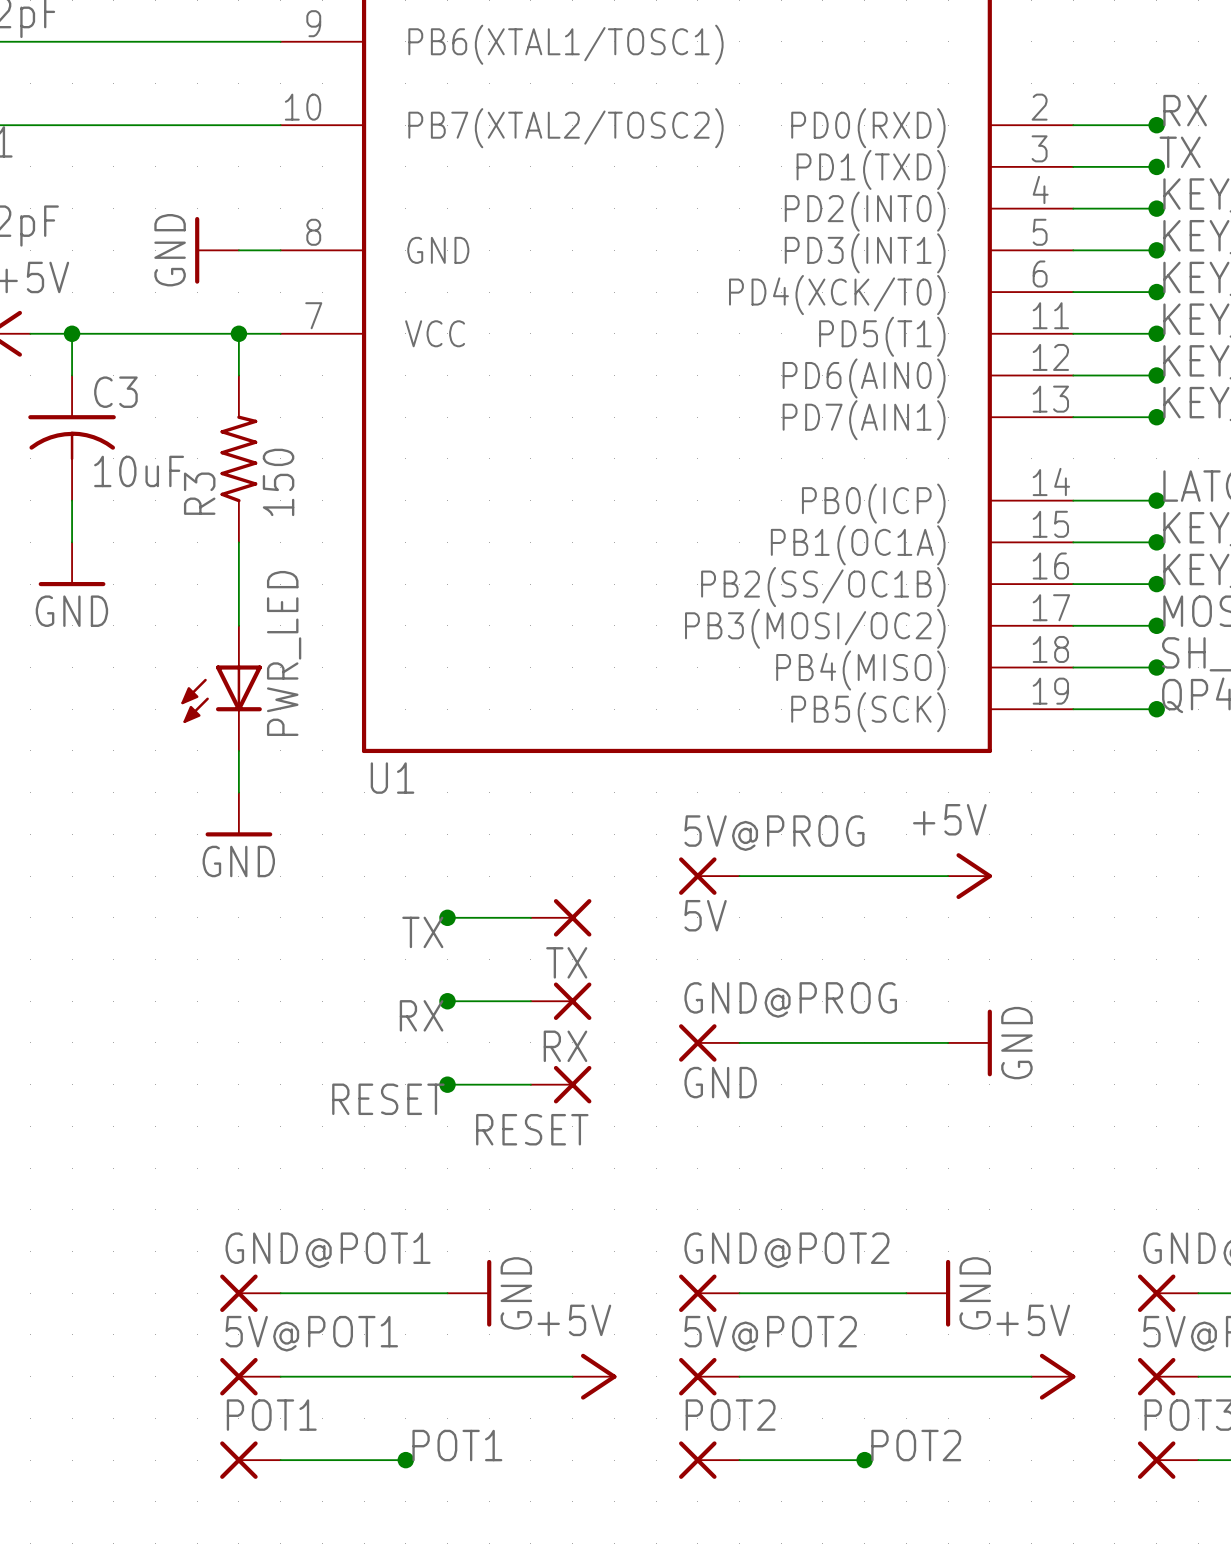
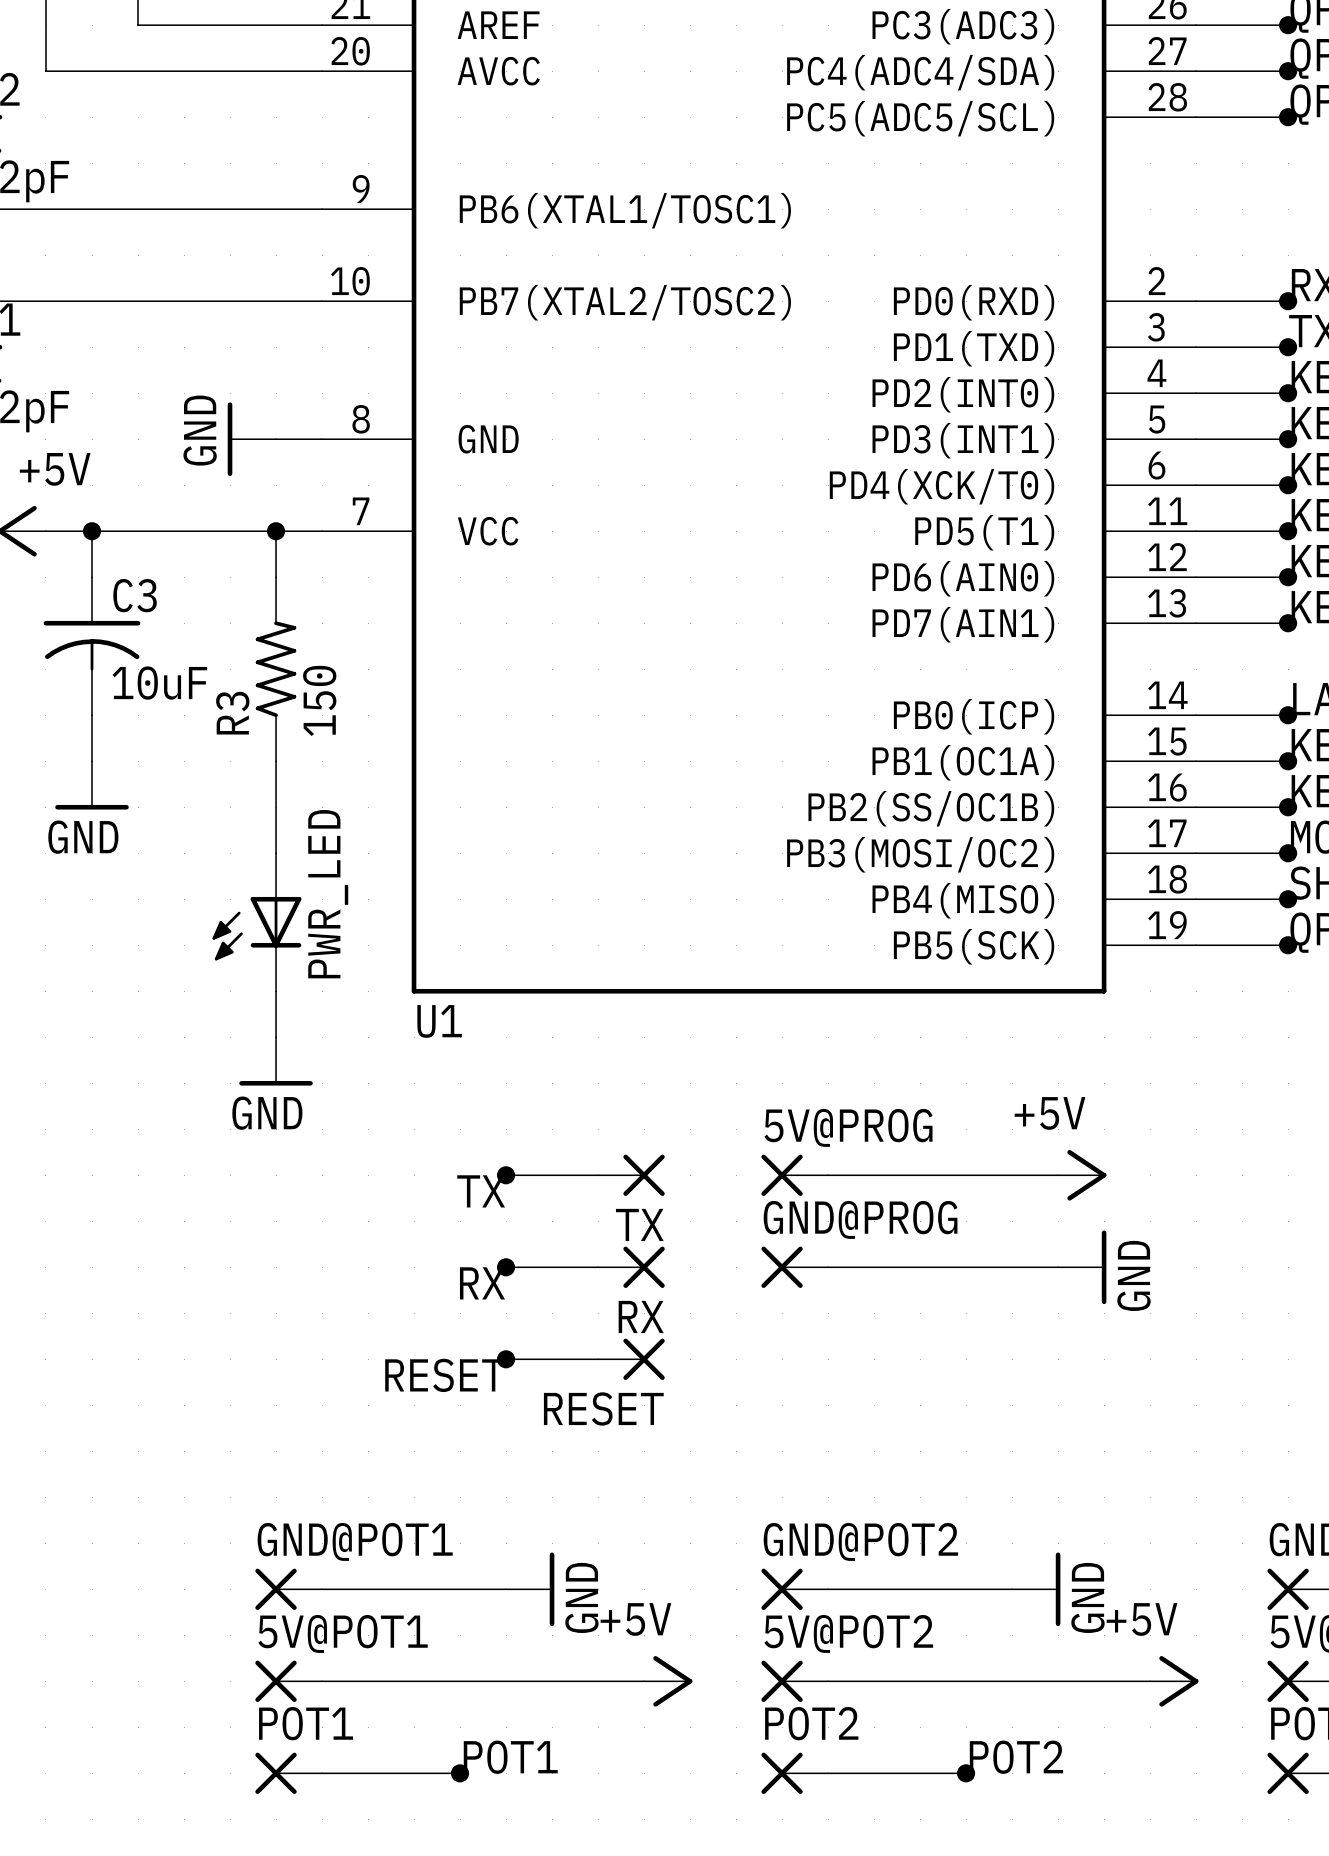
5V@PROG position: (709, 876) -> (794, 1175)
wire: (739, 876) (948, 876) -> (828, 1175) (1058, 1175)
power symbol position: +5V (970, 876) -> +5V (1082, 1175)
5V@PROG value: 5V (705, 915) -> none
GND@PROG: none -> (794, 1267)
GND@PROG: GND (709, 1042) -> none
wire: (739, 1042) (948, 1042) -> (828, 1267) (1058, 1267)
power symbol position: GND (970, 1042) -> GND (1082, 1267)

